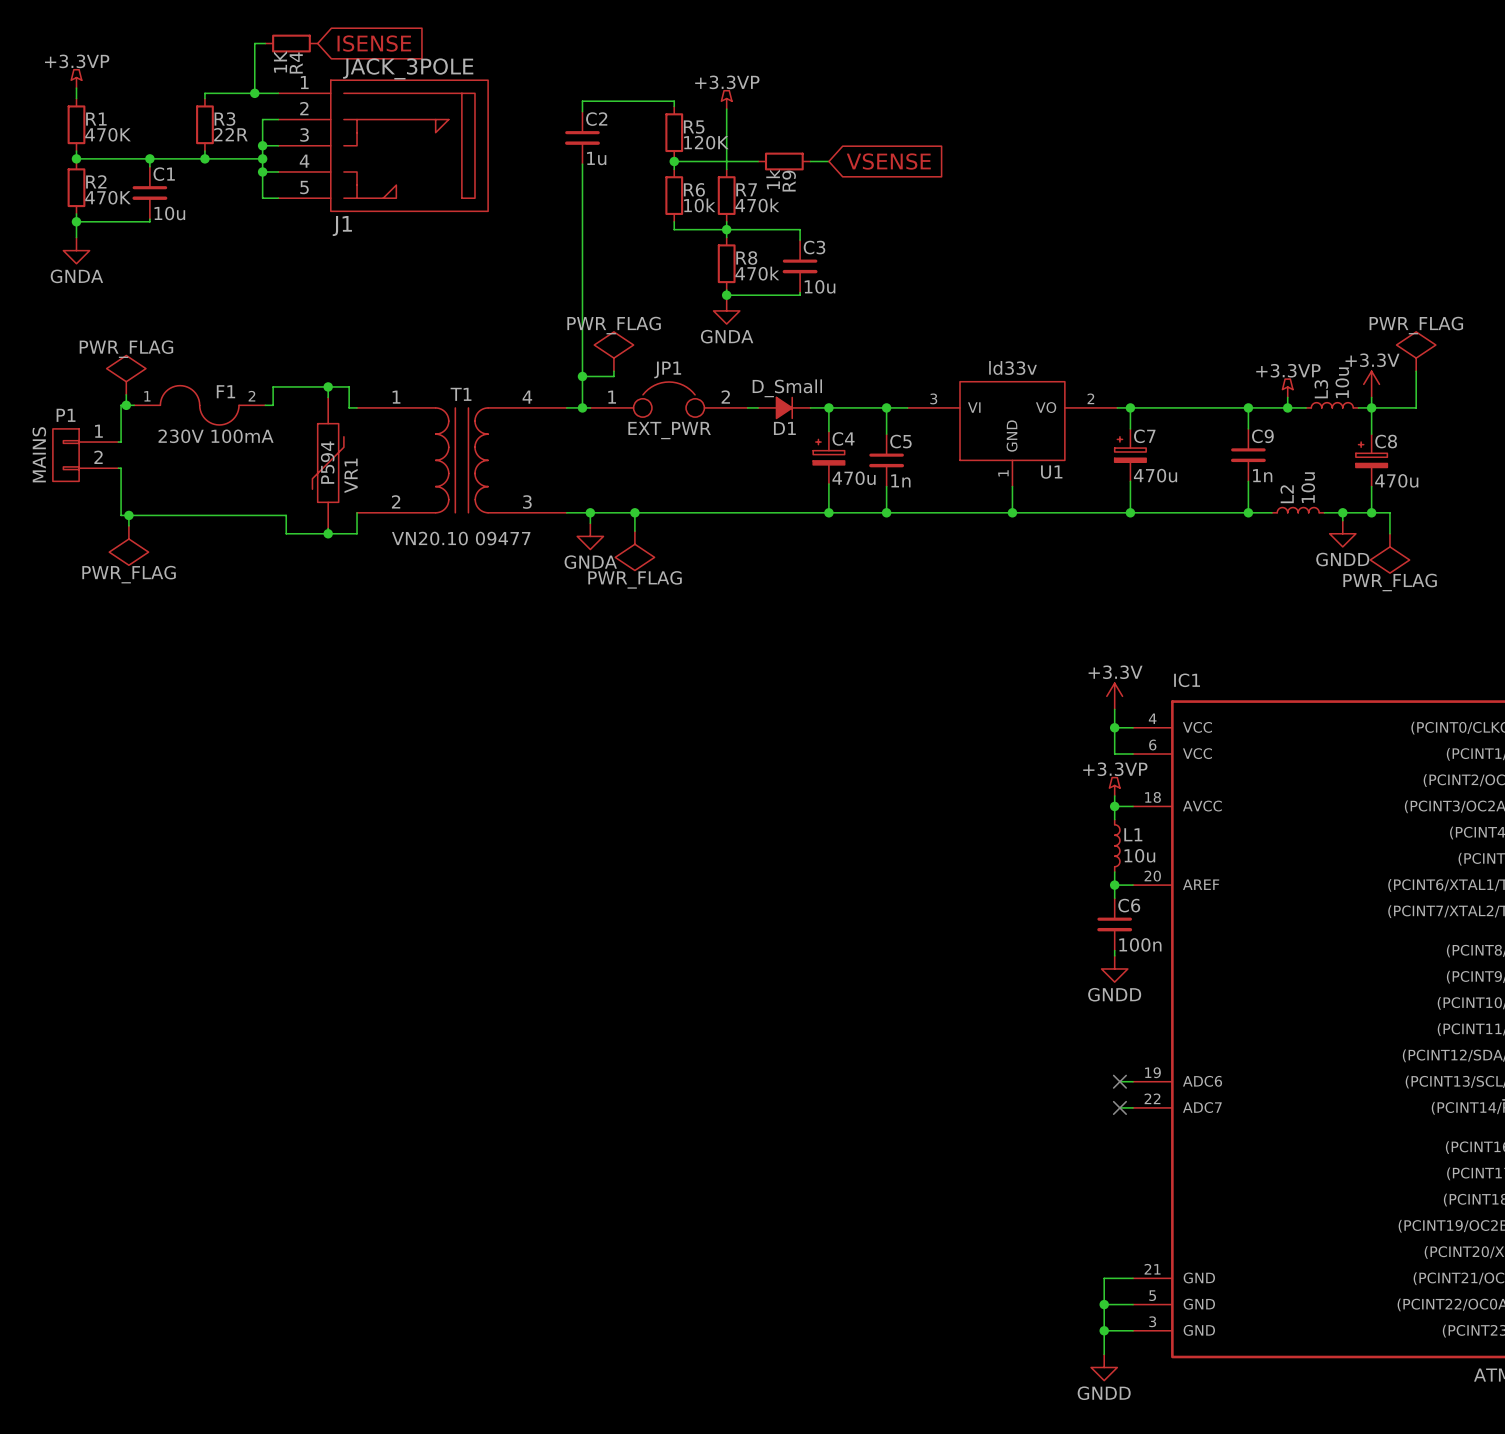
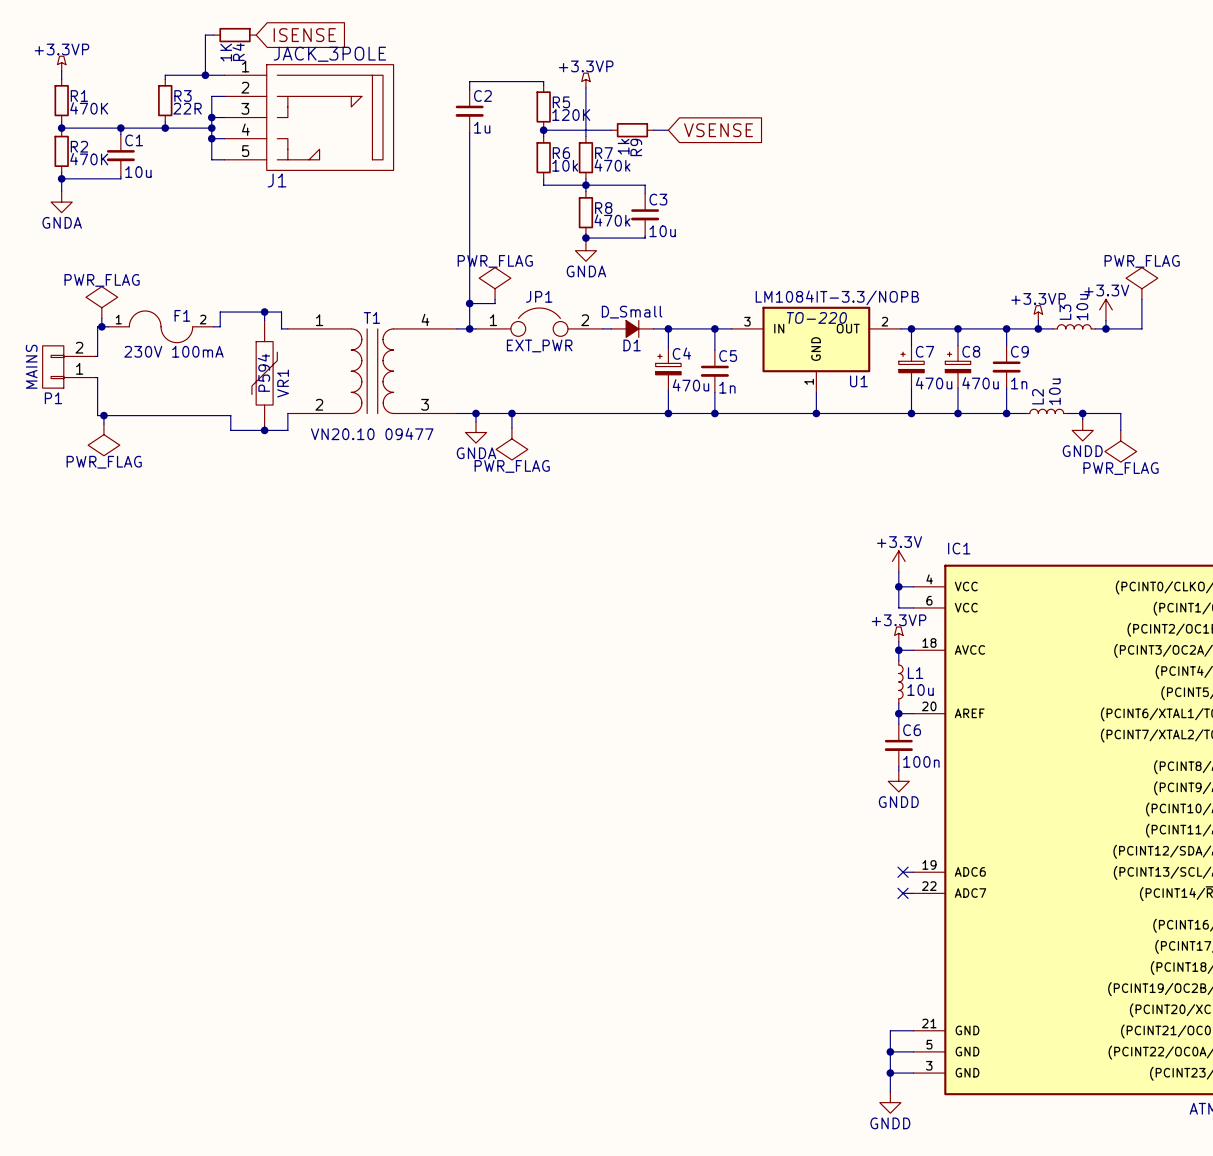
U1 value: ld33v (1013, 367) -> LM1084IT-3.3/NOPB (837, 297)
U1 symbol: [907, 381, 1118, 487] -> [731, 306, 901, 393]
U1 text: none -> TO-220 (816, 317)
wire: none -> (958, 328) (958, 345)
junction: none -> (958, 328)
wire: (1371, 407) (1371, 434) -> none
P1 flip: as is (66, 455) -> up-down (53, 366)
C8 position: (1371, 460) -> (958, 366)
wire: none -> (958, 388) (958, 413)
wire: (1371, 486) (1371, 512) -> none
junction: none -> (958, 413)
junction: (1371, 512) -> none

